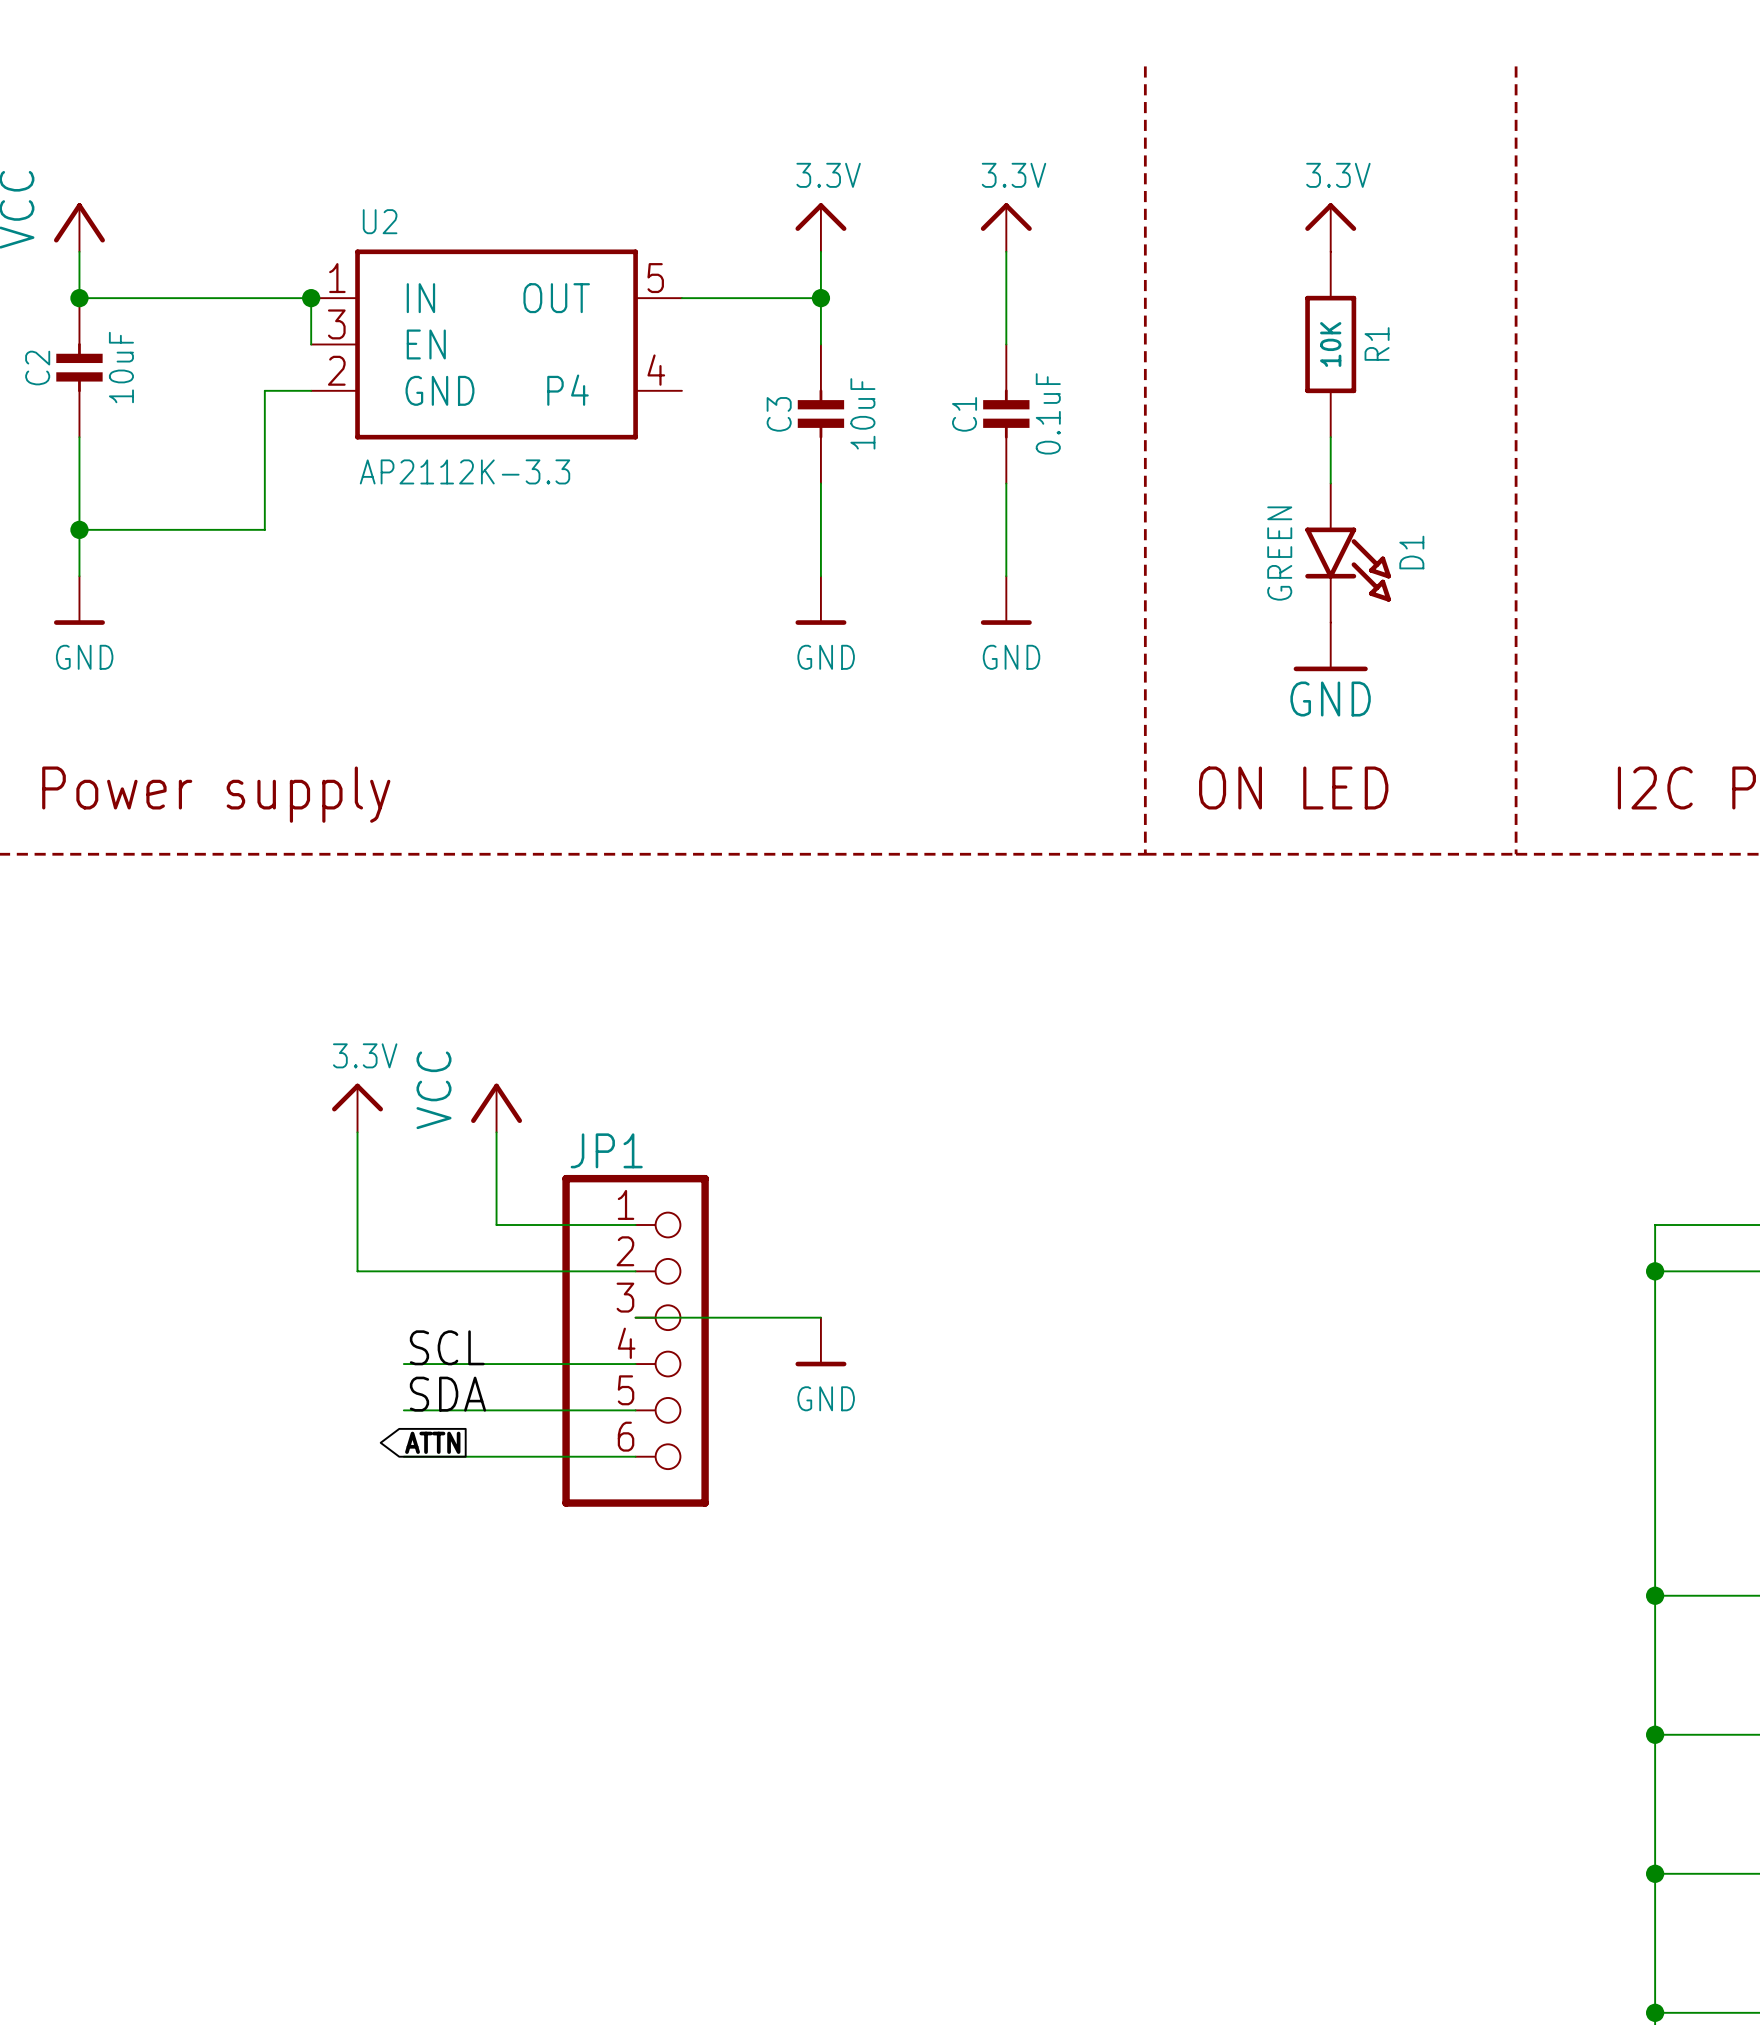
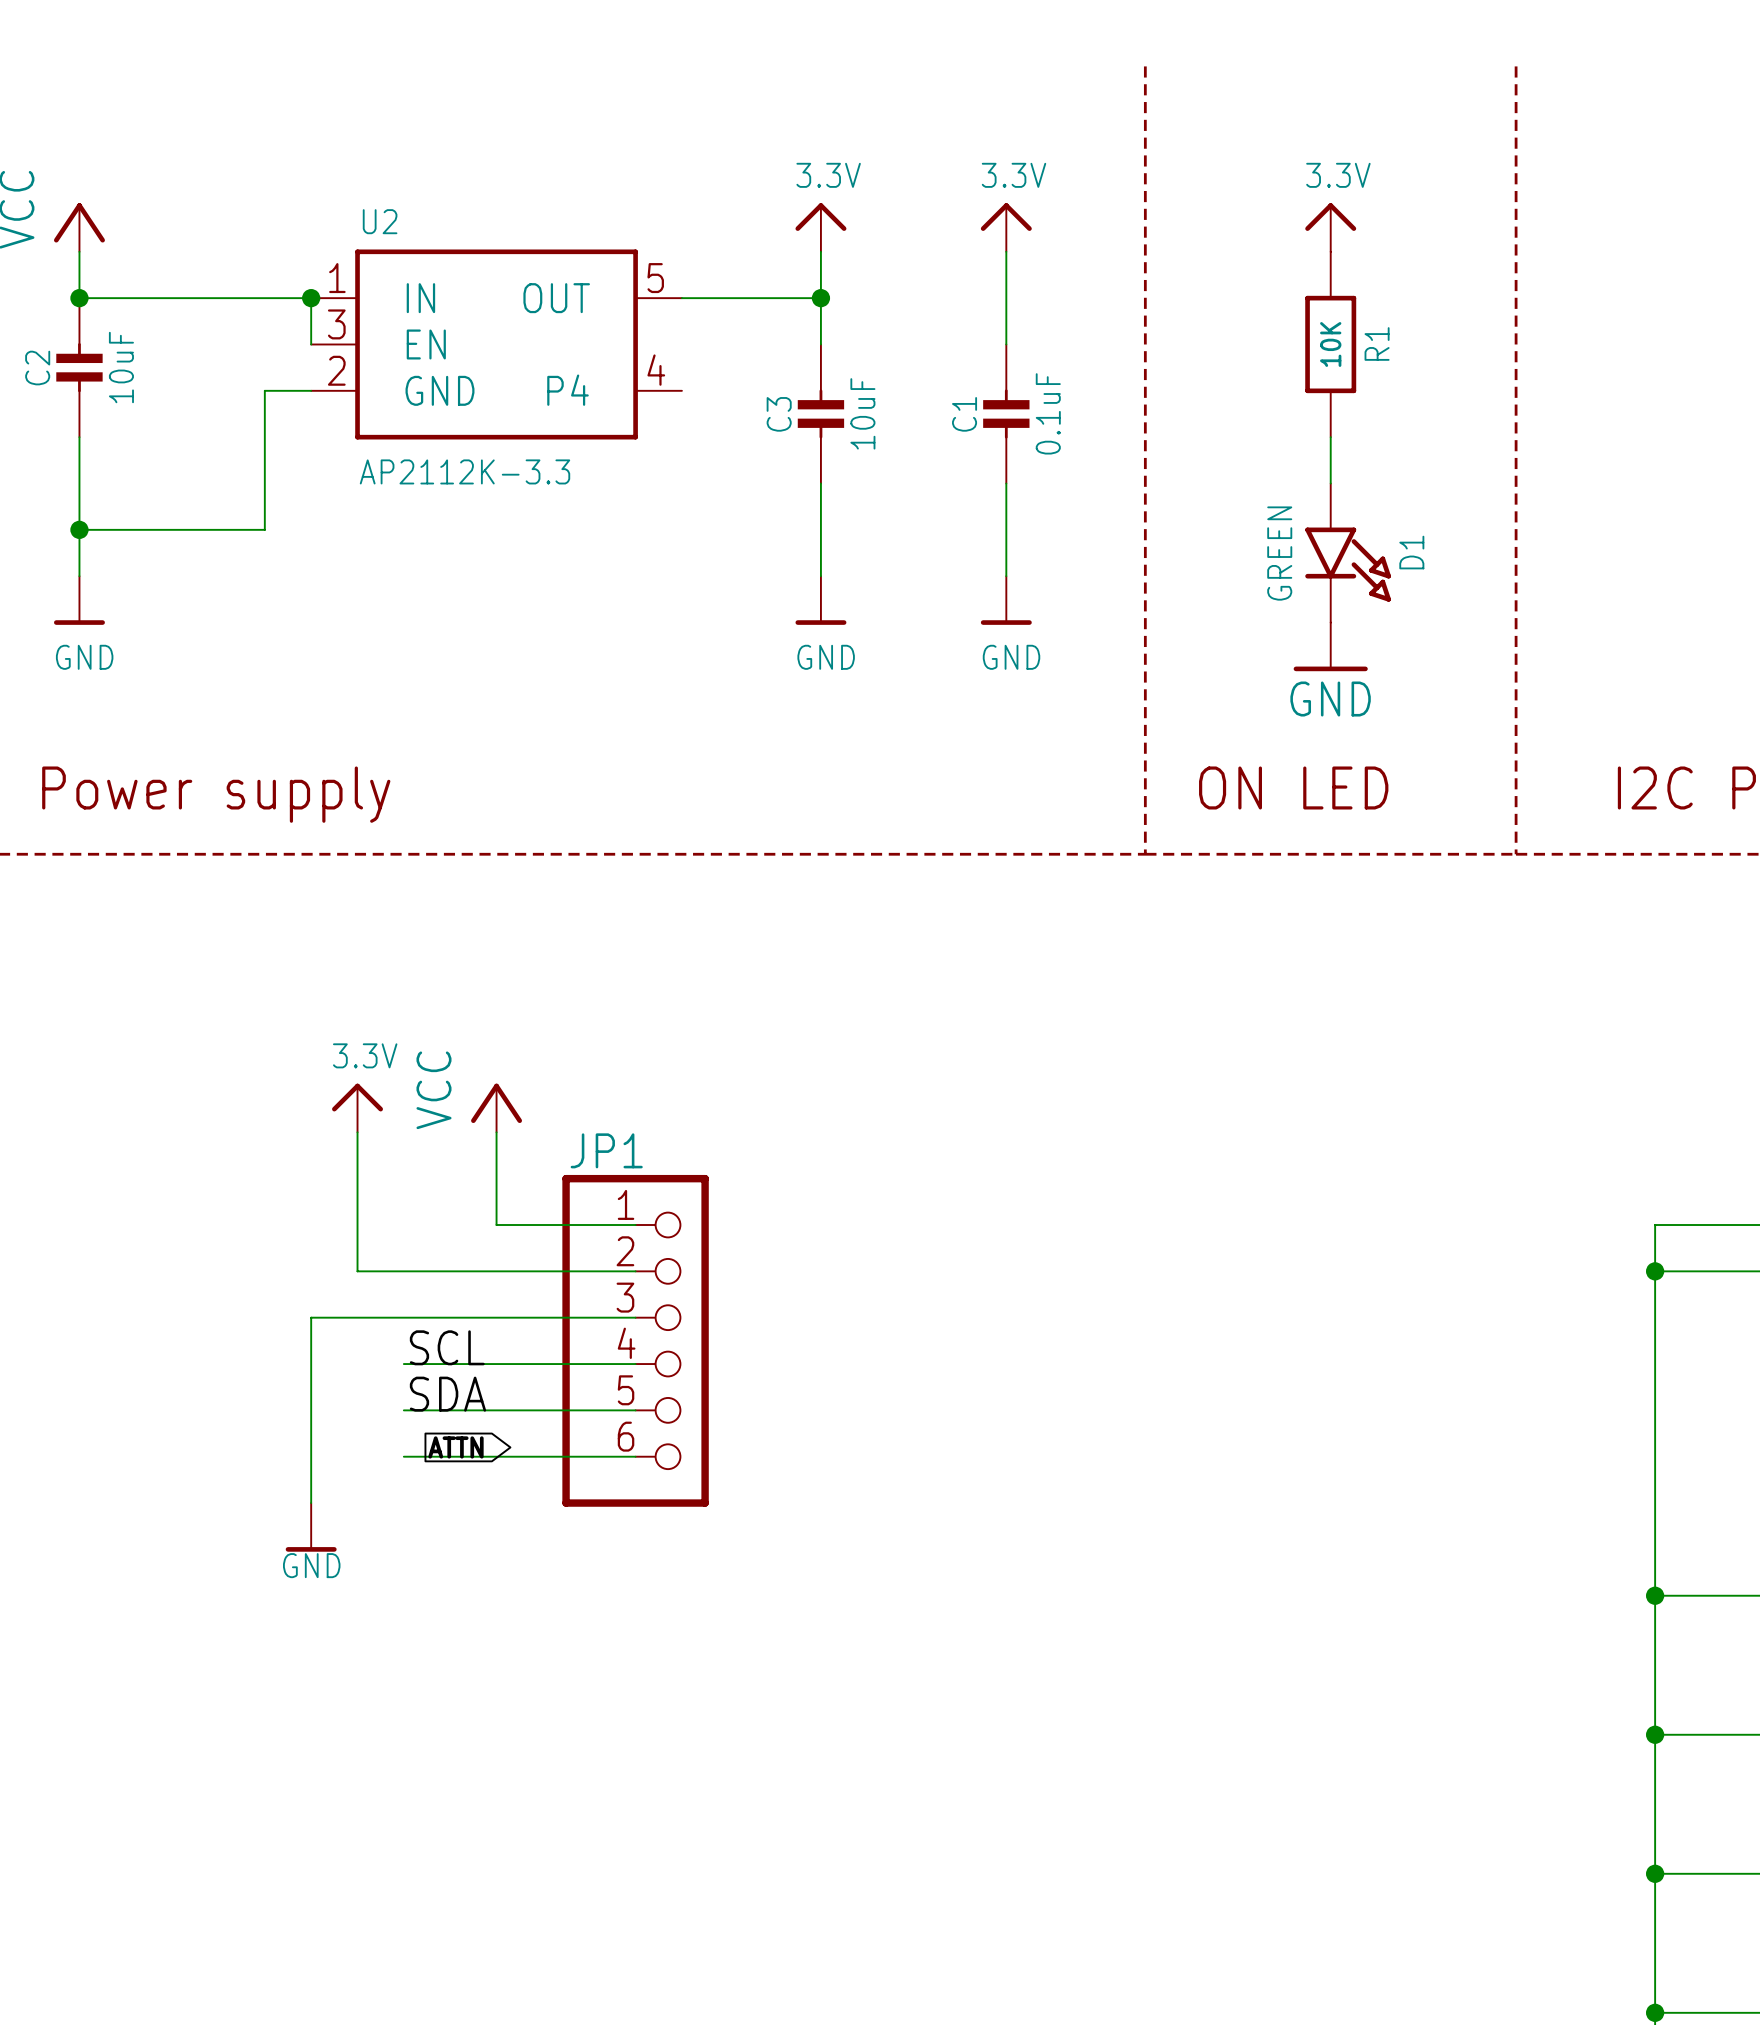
wire: (635, 1317) (820, 1317) -> (635, 1317) (311, 1317) (311, 1503)
power symbol: GND (820, 1342) -> none
global label rotation: 0° (432, 1442) -> 180° (455, 1447)
power symbol: none -> GND (311, 1527)

